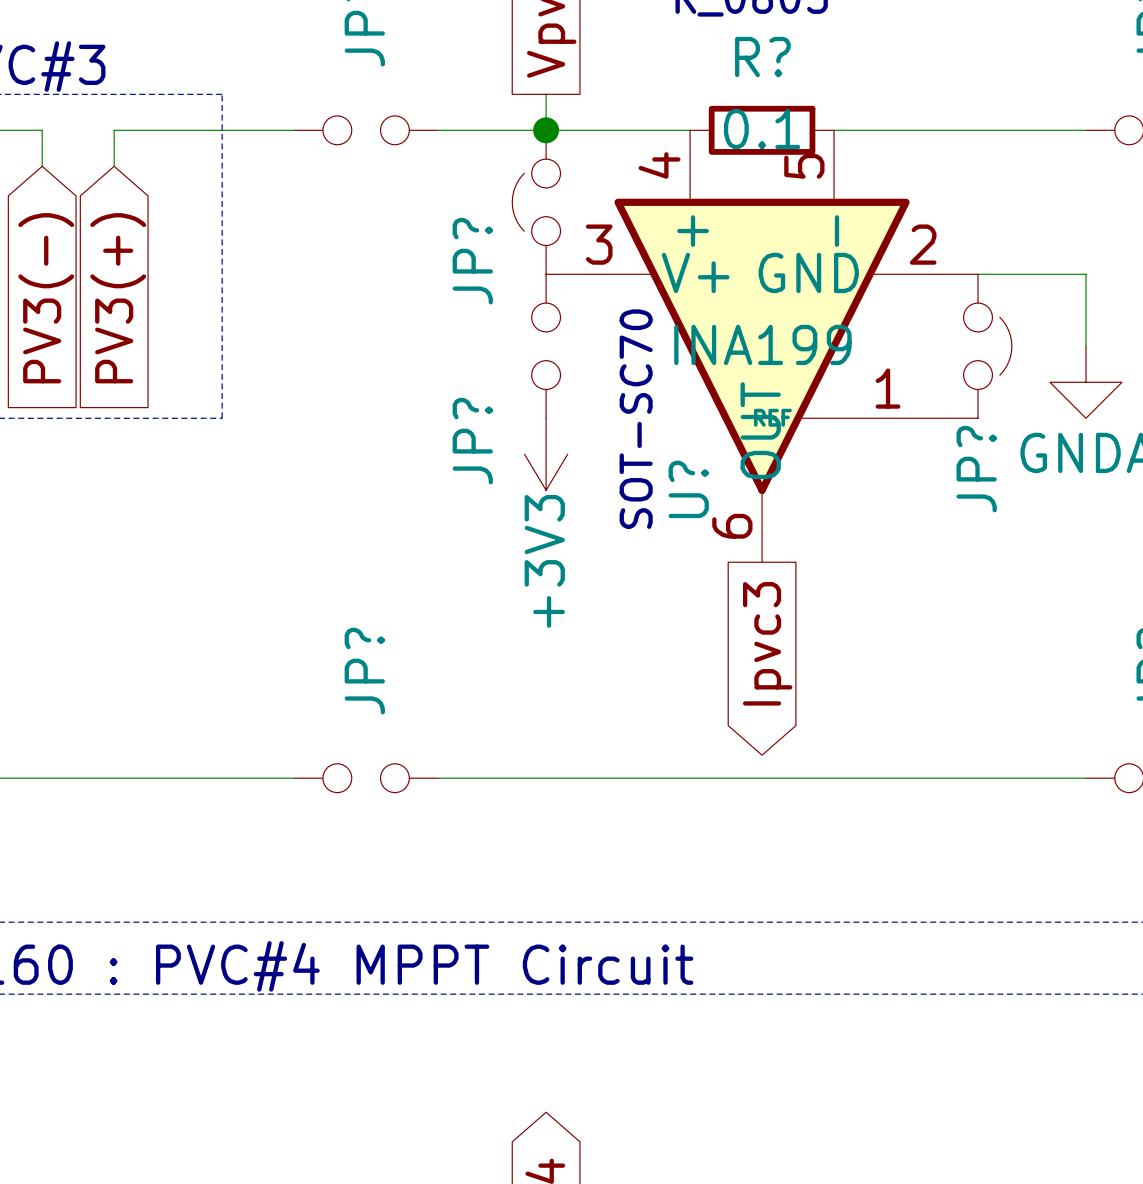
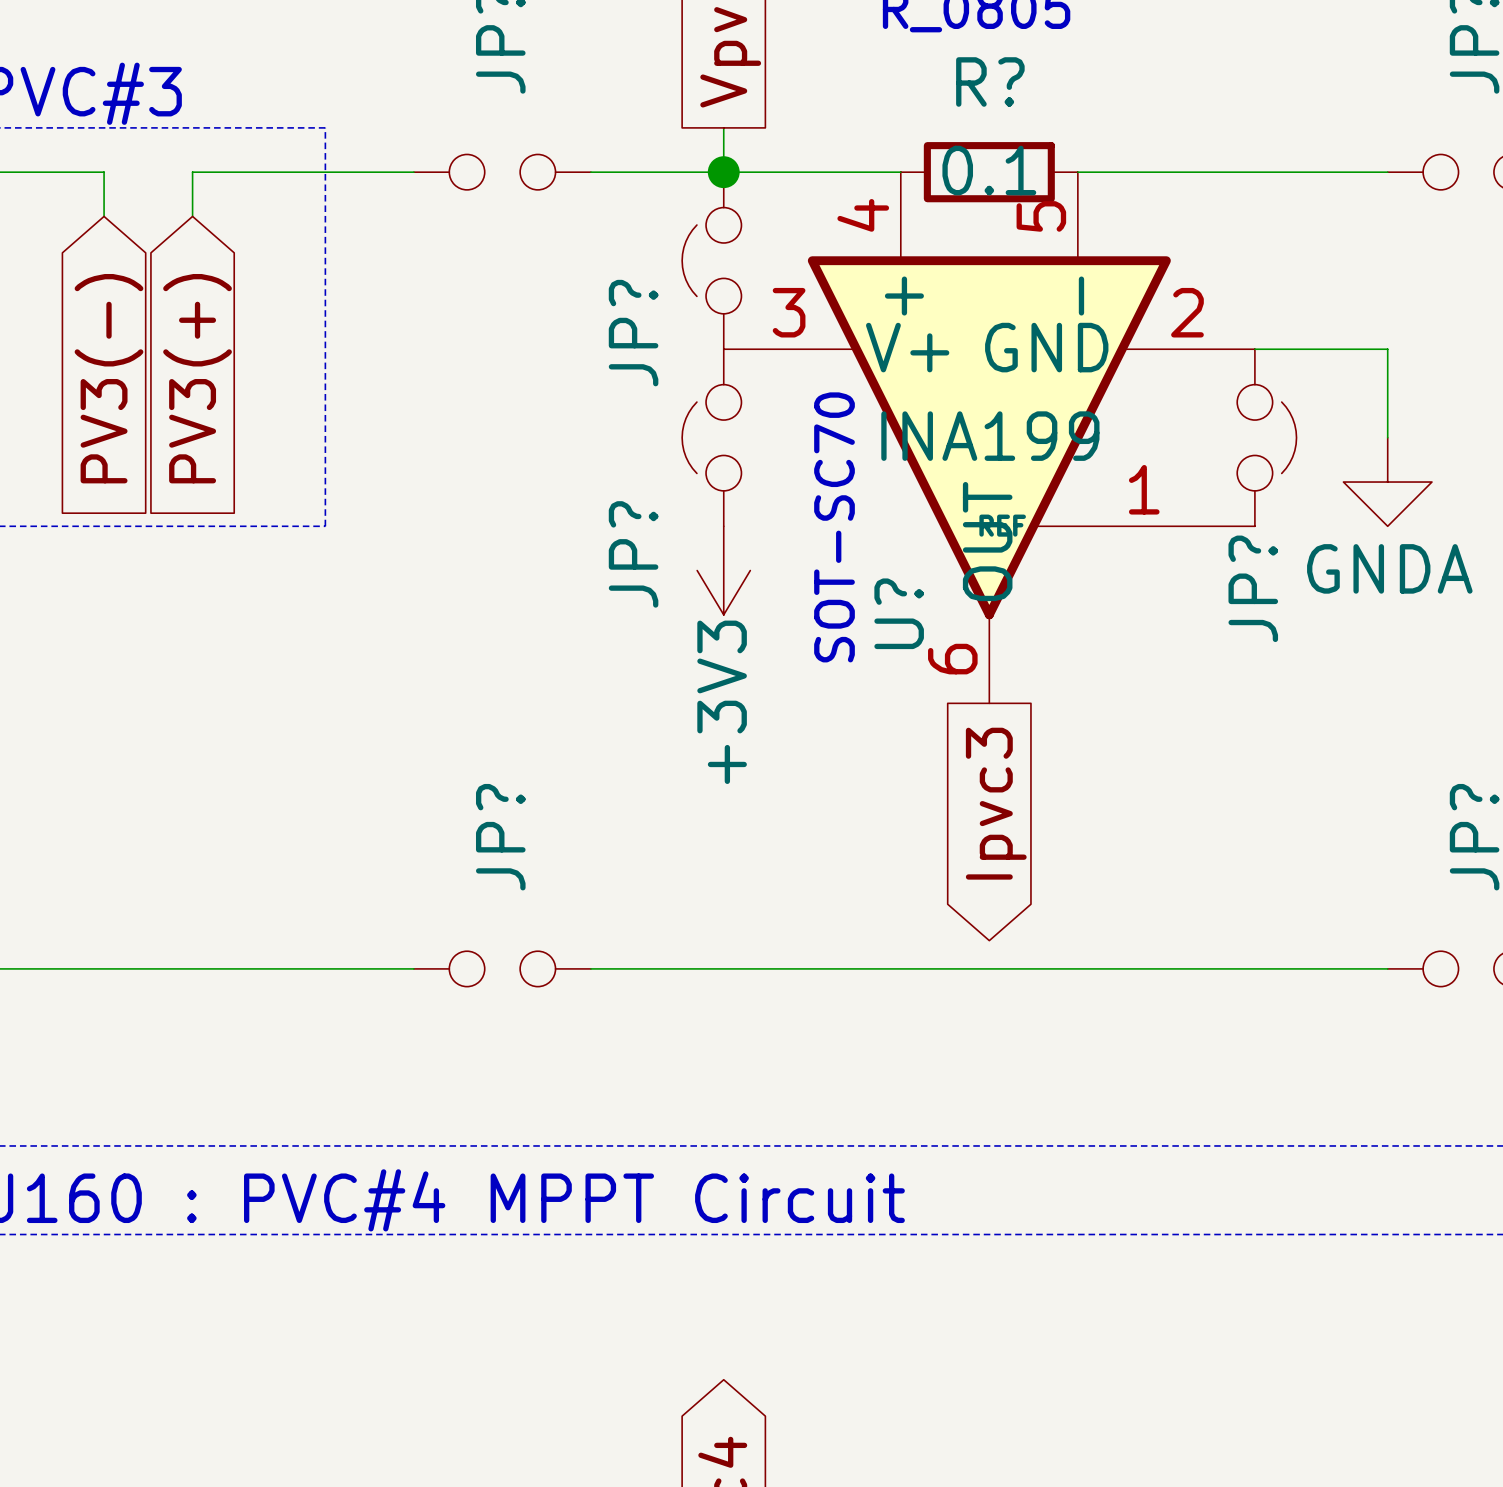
JP? symbol: [531, 274, 561, 419] -> [682, 349, 742, 527]

